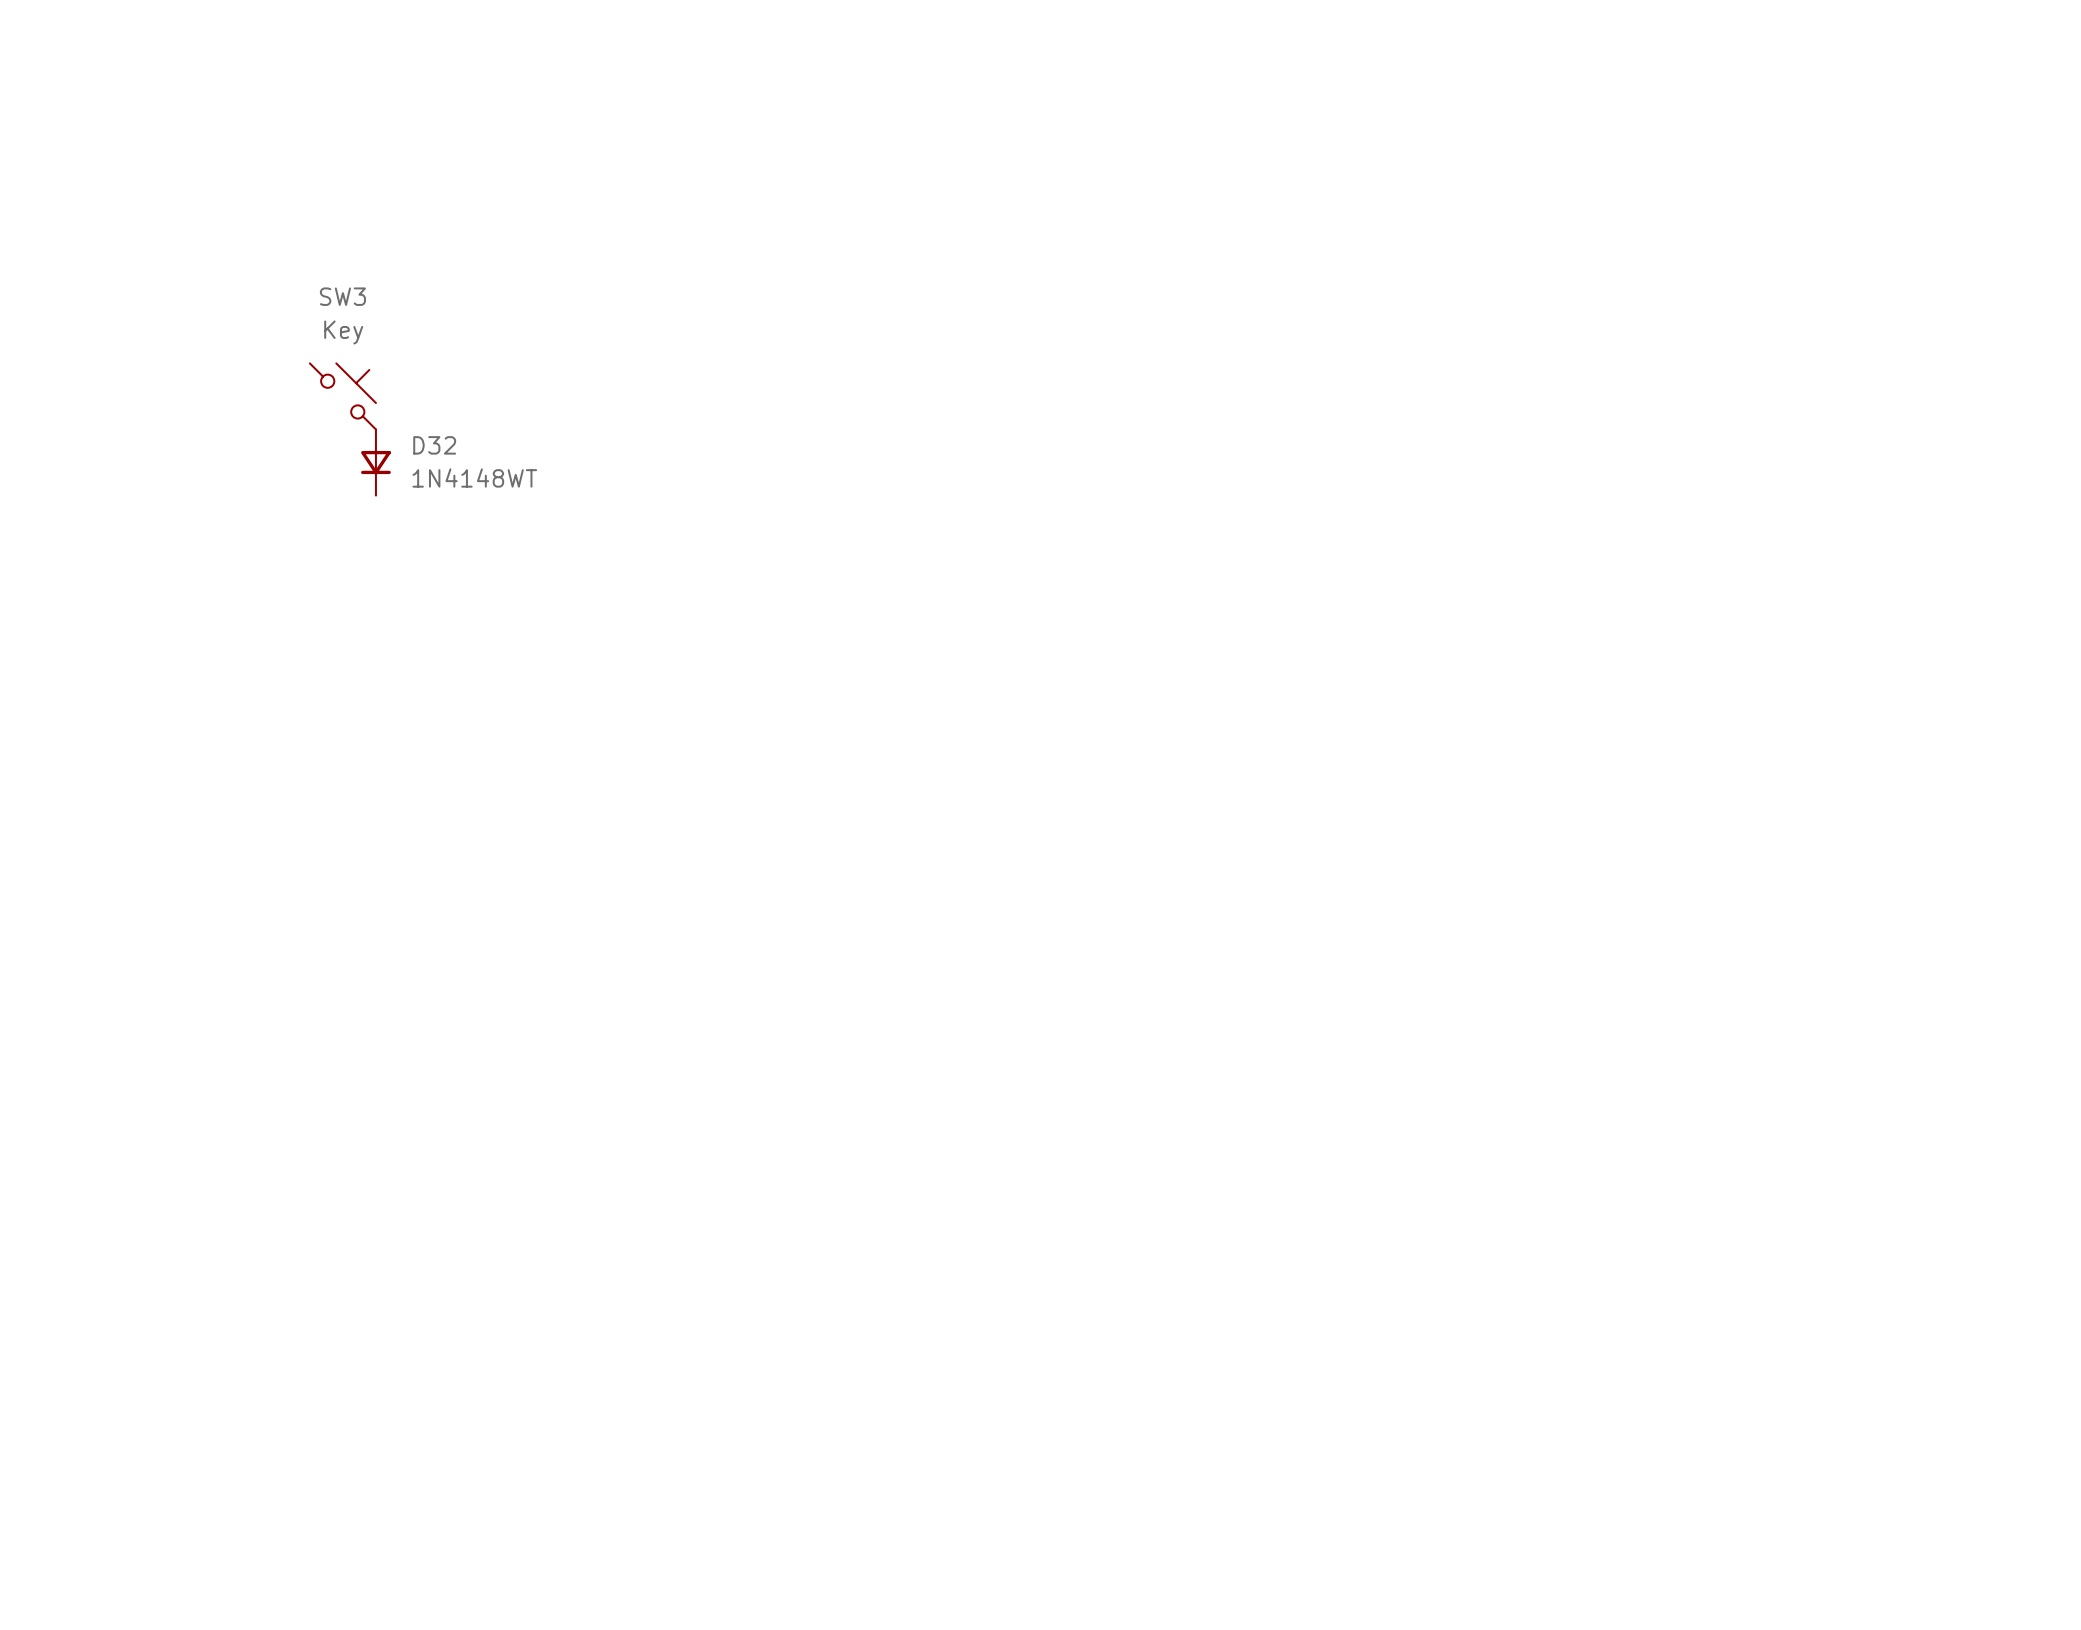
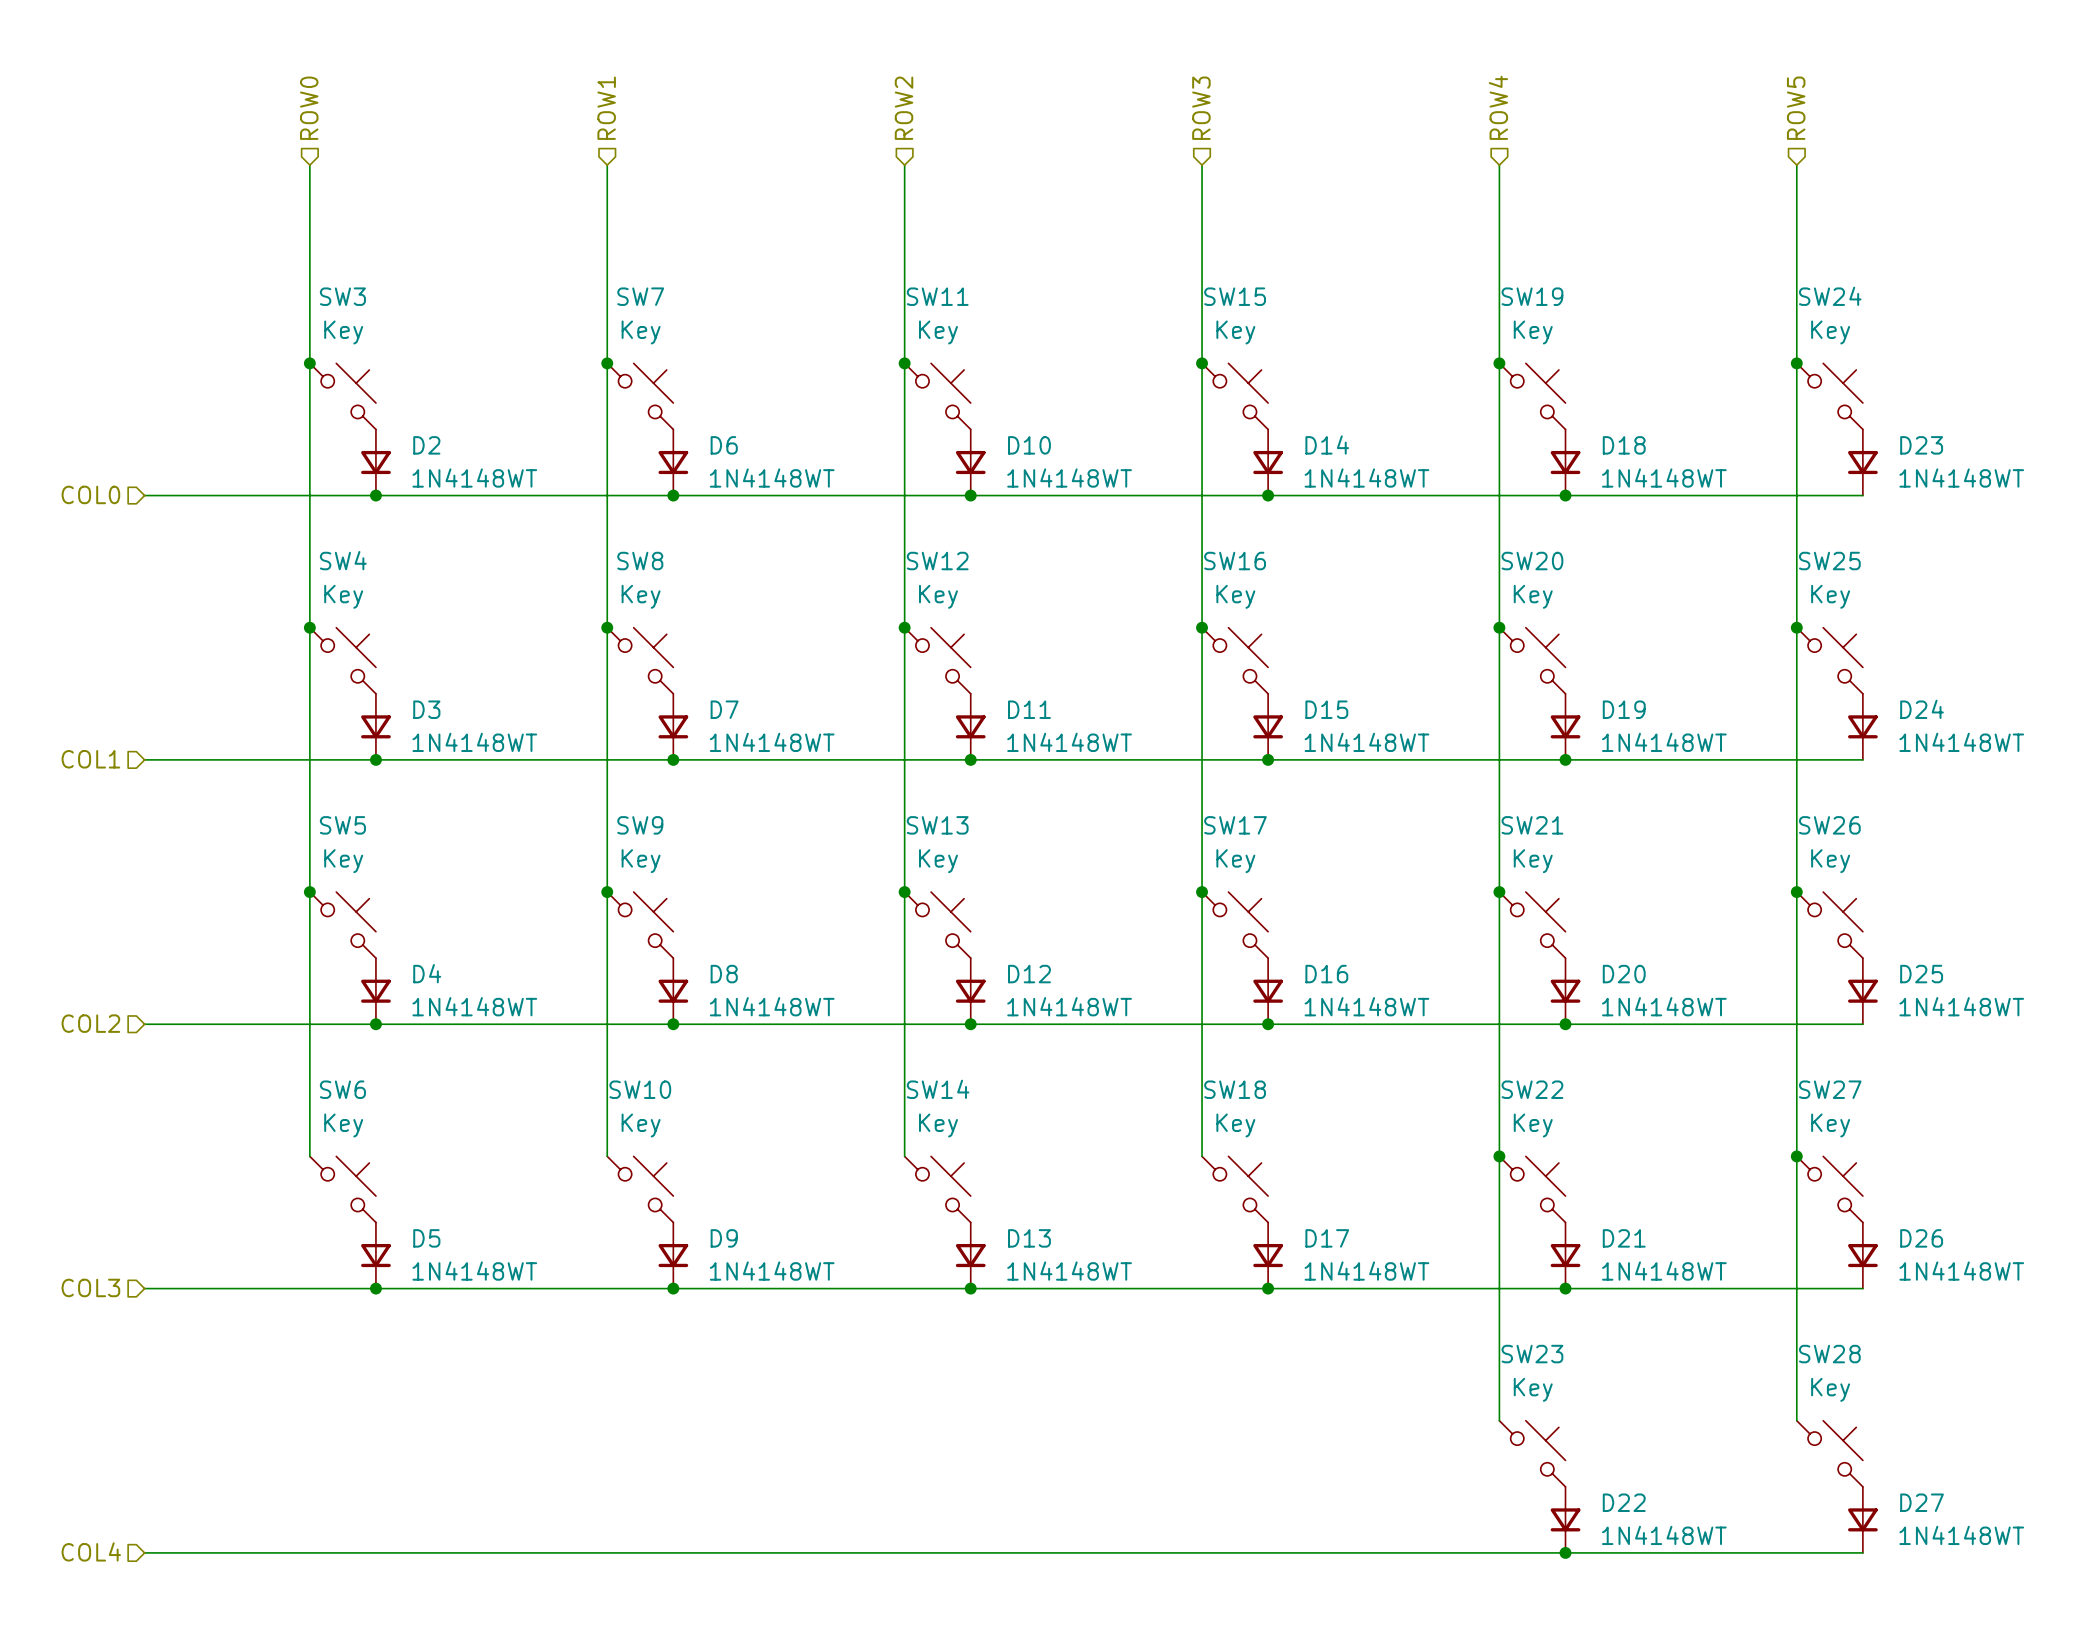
hierarchical label: none -> ROW4 (1498, 107)
hierarchical label: none -> ROW0 (309, 108)
hierarchical label: none -> ROW1 (606, 108)
hierarchical label: none -> ROW2 (904, 108)
hierarchical label: none -> ROW3 (1201, 108)
hierarchical label: none -> ROW5 (1796, 108)
wire: none -> (309, 165) (309, 1156)
wire: none -> (607, 165) (607, 1156)
wire: none -> (904, 165) (904, 1156)
wire: none -> (1202, 165) (1202, 1156)
wire: none -> (1499, 165) (1499, 1420)
wire: none -> (1796, 165) (1796, 1420)
junction: none -> (309, 363)
junction: none -> (607, 363)
junction: none -> (904, 363)
junction: none -> (1202, 363)
junction: none -> (1499, 363)
junction: none -> (1796, 363)
SW7: none -> Key (640, 396)
SW11: none -> Key (937, 396)
SW15: none -> Key (1235, 396)
SW19: none -> Key (1532, 396)
SW24: none -> Key (1829, 396)
D32 name: D32 (434, 445) -> D2 (426, 445)
D6: none -> 1N4148WT (673, 462)
D10: none -> 1N4148WT (970, 462)
D14: none -> 1N4148WT (1268, 462)
D18: none -> 1N4148WT (1565, 462)
D23: none -> 1N4148WT (1862, 462)
hierarchical label: none -> COL0 (90, 494)
wire: none -> (144, 495) (1862, 495)
junction: none -> (375, 495)
junction: none -> (673, 495)
junction: none -> (970, 495)
junction: none -> (1268, 495)
junction: none -> (1565, 495)
junction: none -> (309, 627)
junction: none -> (607, 627)
junction: none -> (904, 627)
junction: none -> (1202, 627)
junction: none -> (1499, 627)
junction: none -> (1796, 627)
SW4: none -> Key (342, 660)
SW8: none -> Key (640, 660)
SW12: none -> Key (937, 660)
SW16: none -> Key (1235, 660)
SW20: none -> Key (1532, 660)
SW25: none -> Key (1829, 660)
D3: none -> 1N4148WT (375, 726)
D7: none -> 1N4148WT (673, 726)
D11: none -> 1N4148WT (970, 726)
D15: none -> 1N4148WT (1268, 726)
D19: none -> 1N4148WT (1565, 726)
D24: none -> 1N4148WT (1862, 726)
hierarchical label: none -> COL1 (90, 759)
wire: none -> (144, 759) (1862, 759)
junction: none -> (375, 759)
junction: none -> (673, 759)
junction: none -> (970, 759)
junction: none -> (1268, 759)
junction: none -> (1565, 759)
junction: none -> (309, 892)
junction: none -> (607, 892)
junction: none -> (904, 892)
junction: none -> (1202, 892)
junction: none -> (1499, 892)
junction: none -> (1796, 892)
SW5: none -> Key (342, 925)
SW9: none -> Key (640, 925)
SW13: none -> Key (937, 925)
SW17: none -> Key (1235, 925)
SW21: none -> Key (1532, 925)
SW26: none -> Key (1829, 925)
D4: none -> 1N4148WT (375, 991)
D8: none -> 1N4148WT (673, 991)
D12: none -> 1N4148WT (970, 991)
D16: none -> 1N4148WT (1268, 991)
D20: none -> 1N4148WT (1565, 991)
D25: none -> 1N4148WT (1862, 991)
hierarchical label: none -> COL2 (90, 1023)
wire: none -> (144, 1024) (1862, 1024)
junction: none -> (375, 1024)
junction: none -> (673, 1024)
junction: none -> (970, 1024)
junction: none -> (1268, 1024)
junction: none -> (1565, 1024)
junction: none -> (1499, 1156)
junction: none -> (1796, 1156)
SW6: none -> Key (342, 1189)
SW10: none -> Key (640, 1189)
SW14: none -> Key (937, 1189)
SW18: none -> Key (1235, 1189)
SW22: none -> Key (1532, 1189)
SW27: none -> Key (1829, 1189)
D5: none -> 1N4148WT (375, 1255)
D9: none -> 1N4148WT (673, 1255)
D13: none -> 1N4148WT (970, 1255)
D17: none -> 1N4148WT (1268, 1255)
D21: none -> 1N4148WT (1565, 1255)
D26: none -> 1N4148WT (1862, 1255)
hierarchical label: none -> COL3 (90, 1287)
wire: none -> (144, 1288) (1862, 1288)
junction: none -> (375, 1288)
junction: none -> (673, 1288)
junction: none -> (970, 1288)
junction: none -> (1268, 1288)
junction: none -> (1565, 1288)
SW23: none -> Key (1532, 1453)
SW28: none -> Key (1829, 1453)
D22: none -> 1N4148WT (1565, 1519)
D27: none -> 1N4148WT (1862, 1519)
hierarchical label: none -> COL4 (91, 1551)
wire: none -> (144, 1552) (1862, 1552)
junction: none -> (1565, 1552)

